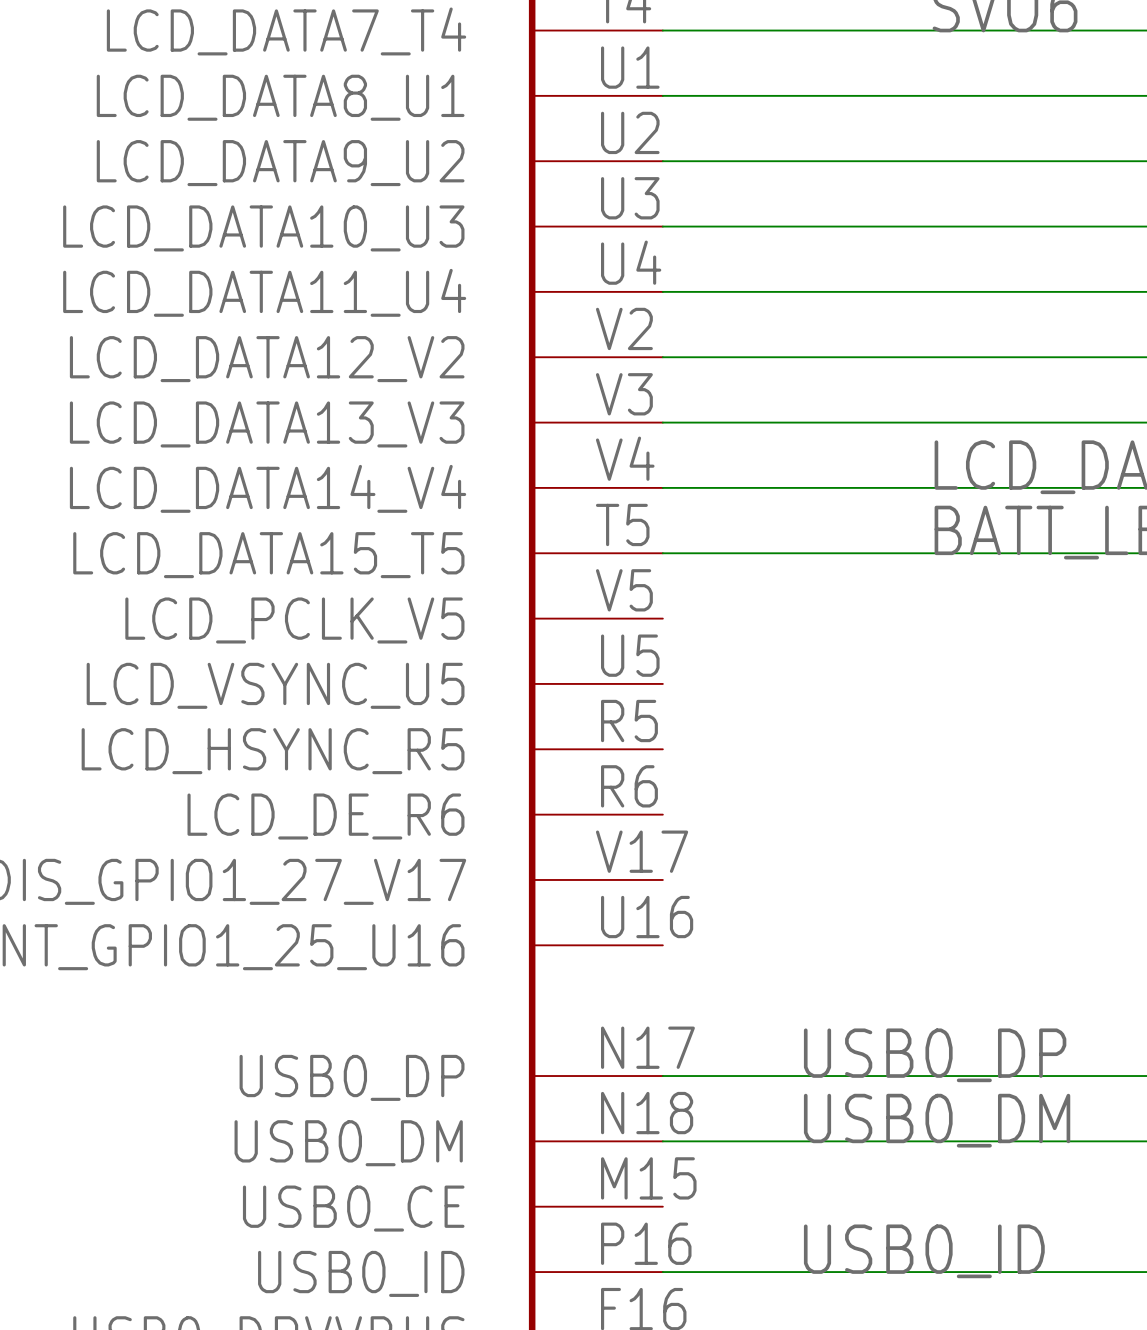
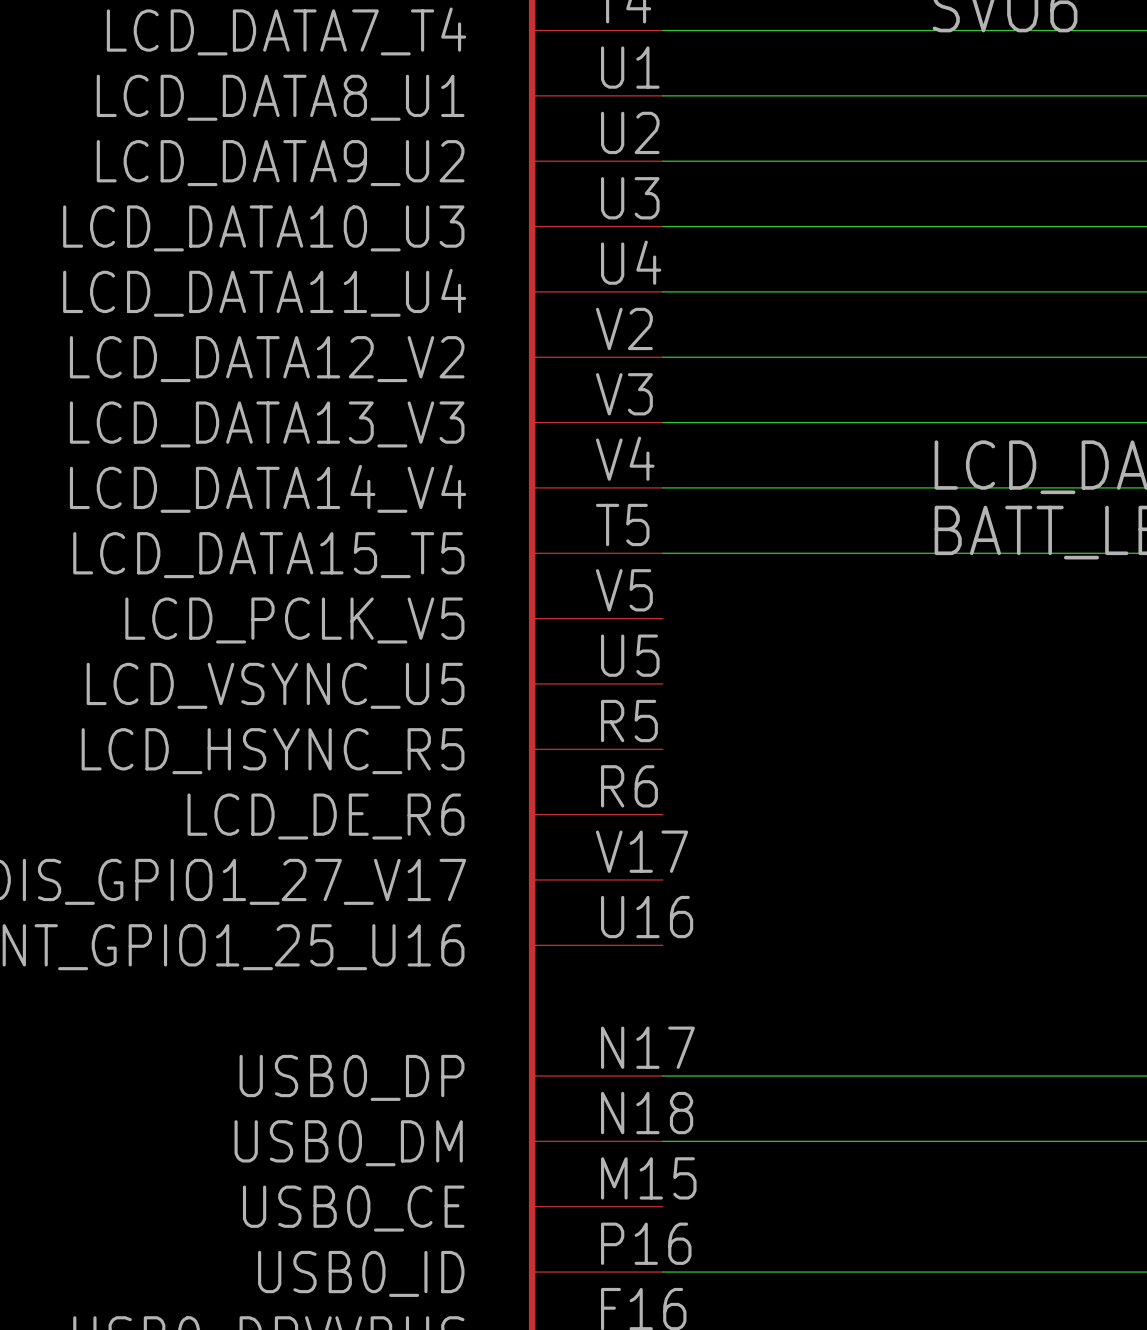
label: USB0_DP (935, 1055) -> none
label: USB0_DM (937, 1120) -> none
label: USB0_ID (924, 1251) -> none

